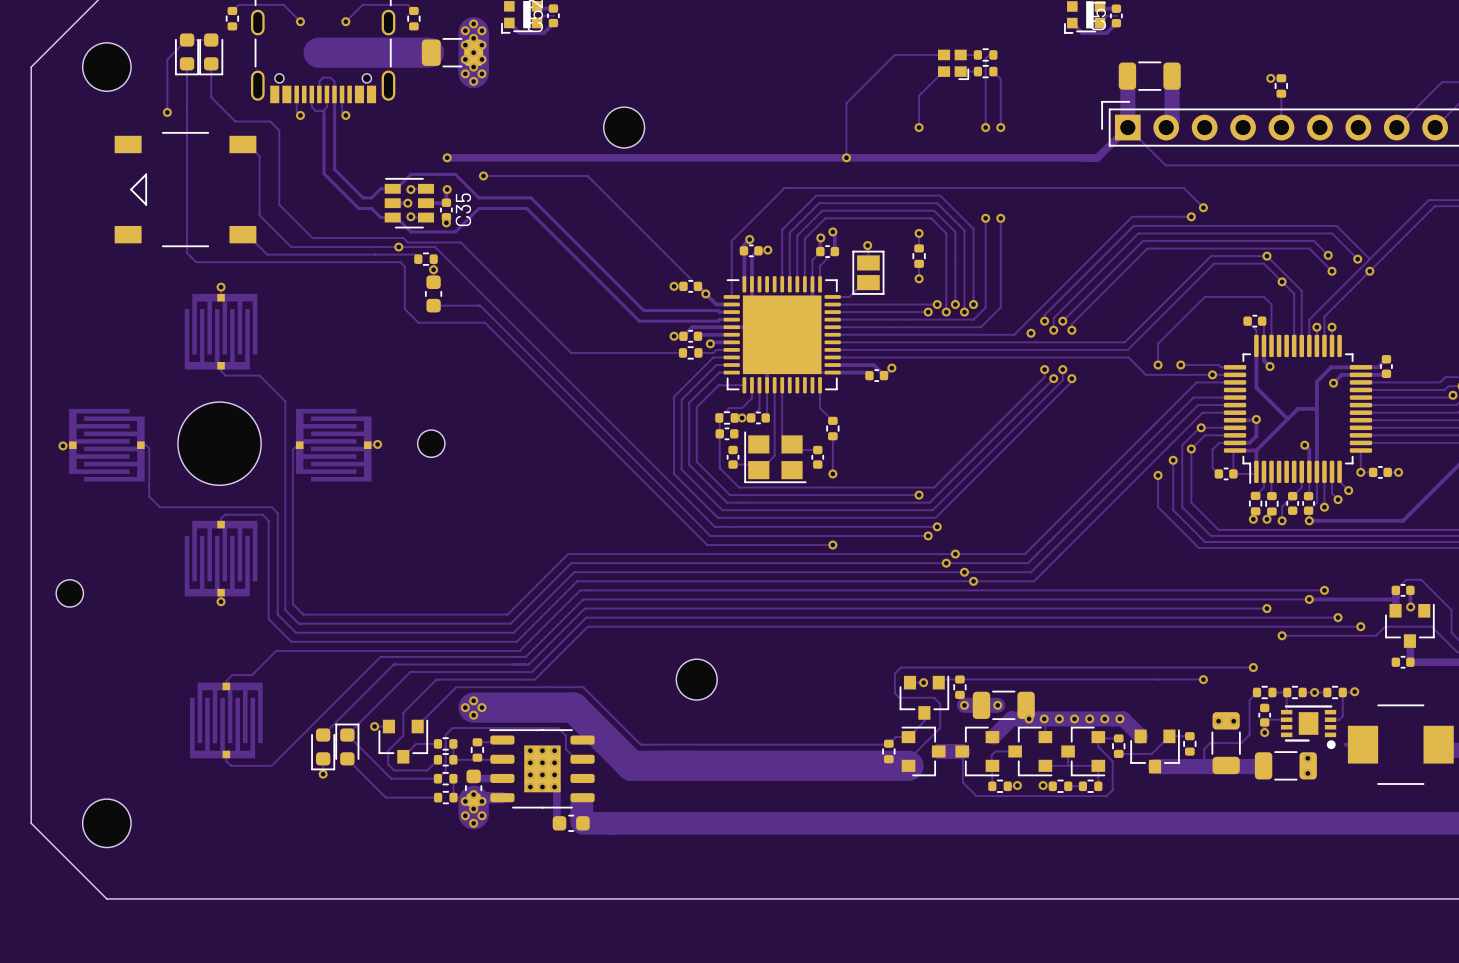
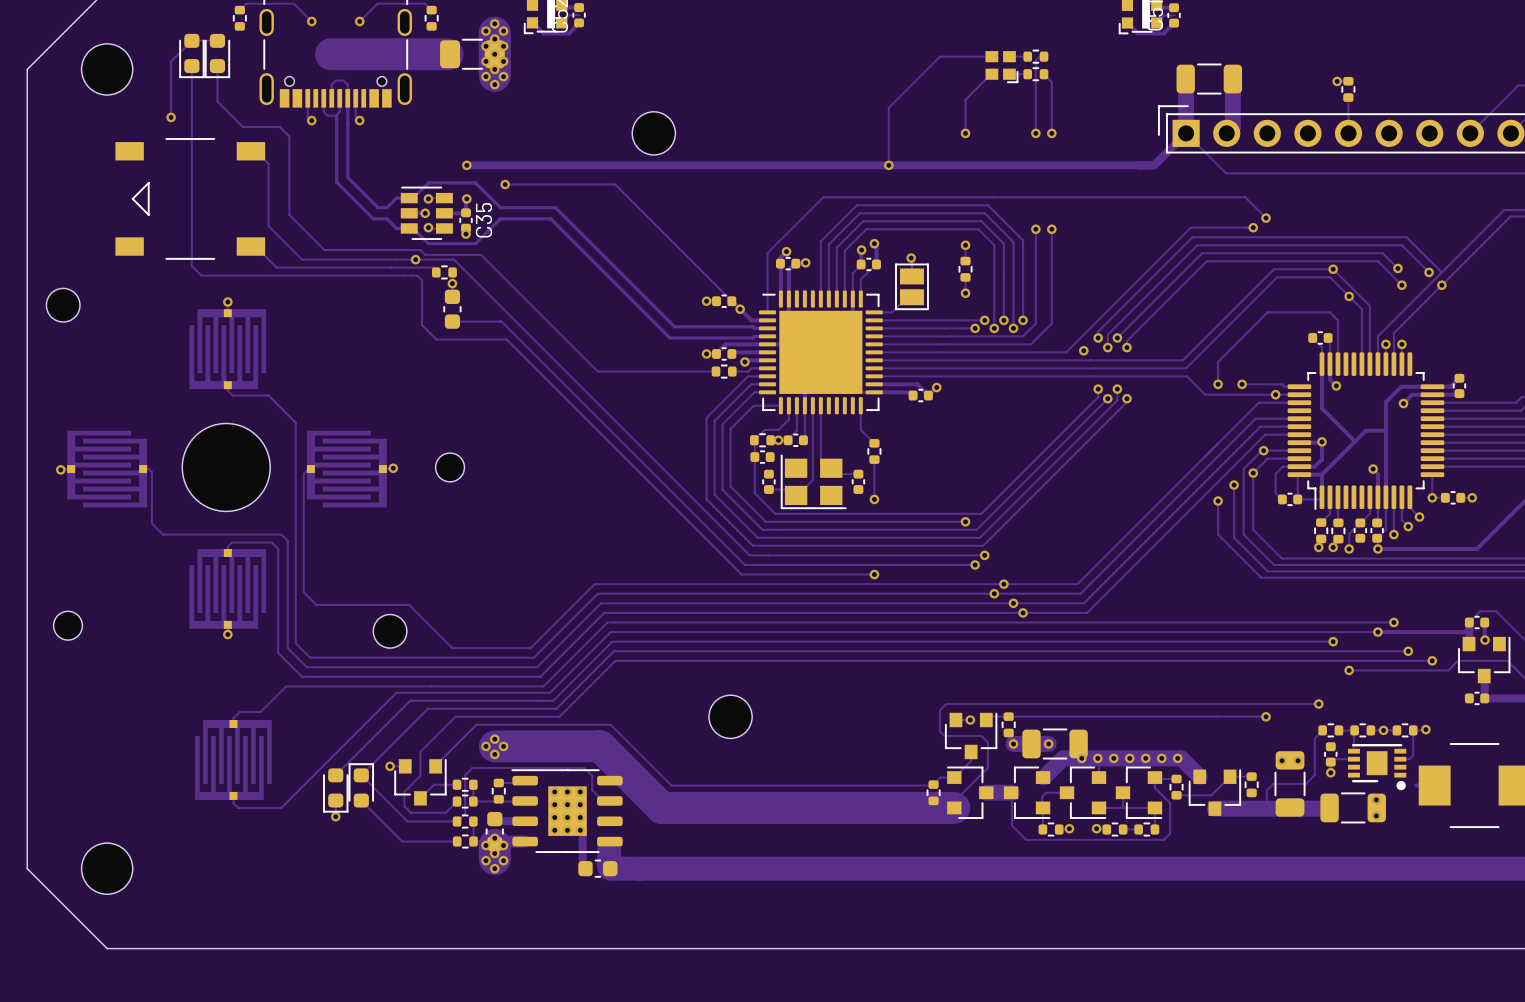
part: none -> (63, 305)
track: (292, 561) (292, 604) (303, 614) (433, 614) -> (303, 592) (316, 604) (409, 604) (452, 648)
part: none -> (390, 631)

